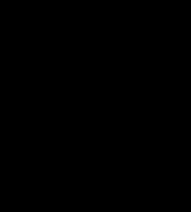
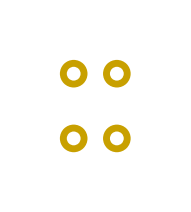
part: none -> (95, 73)
part: none -> (95, 138)

